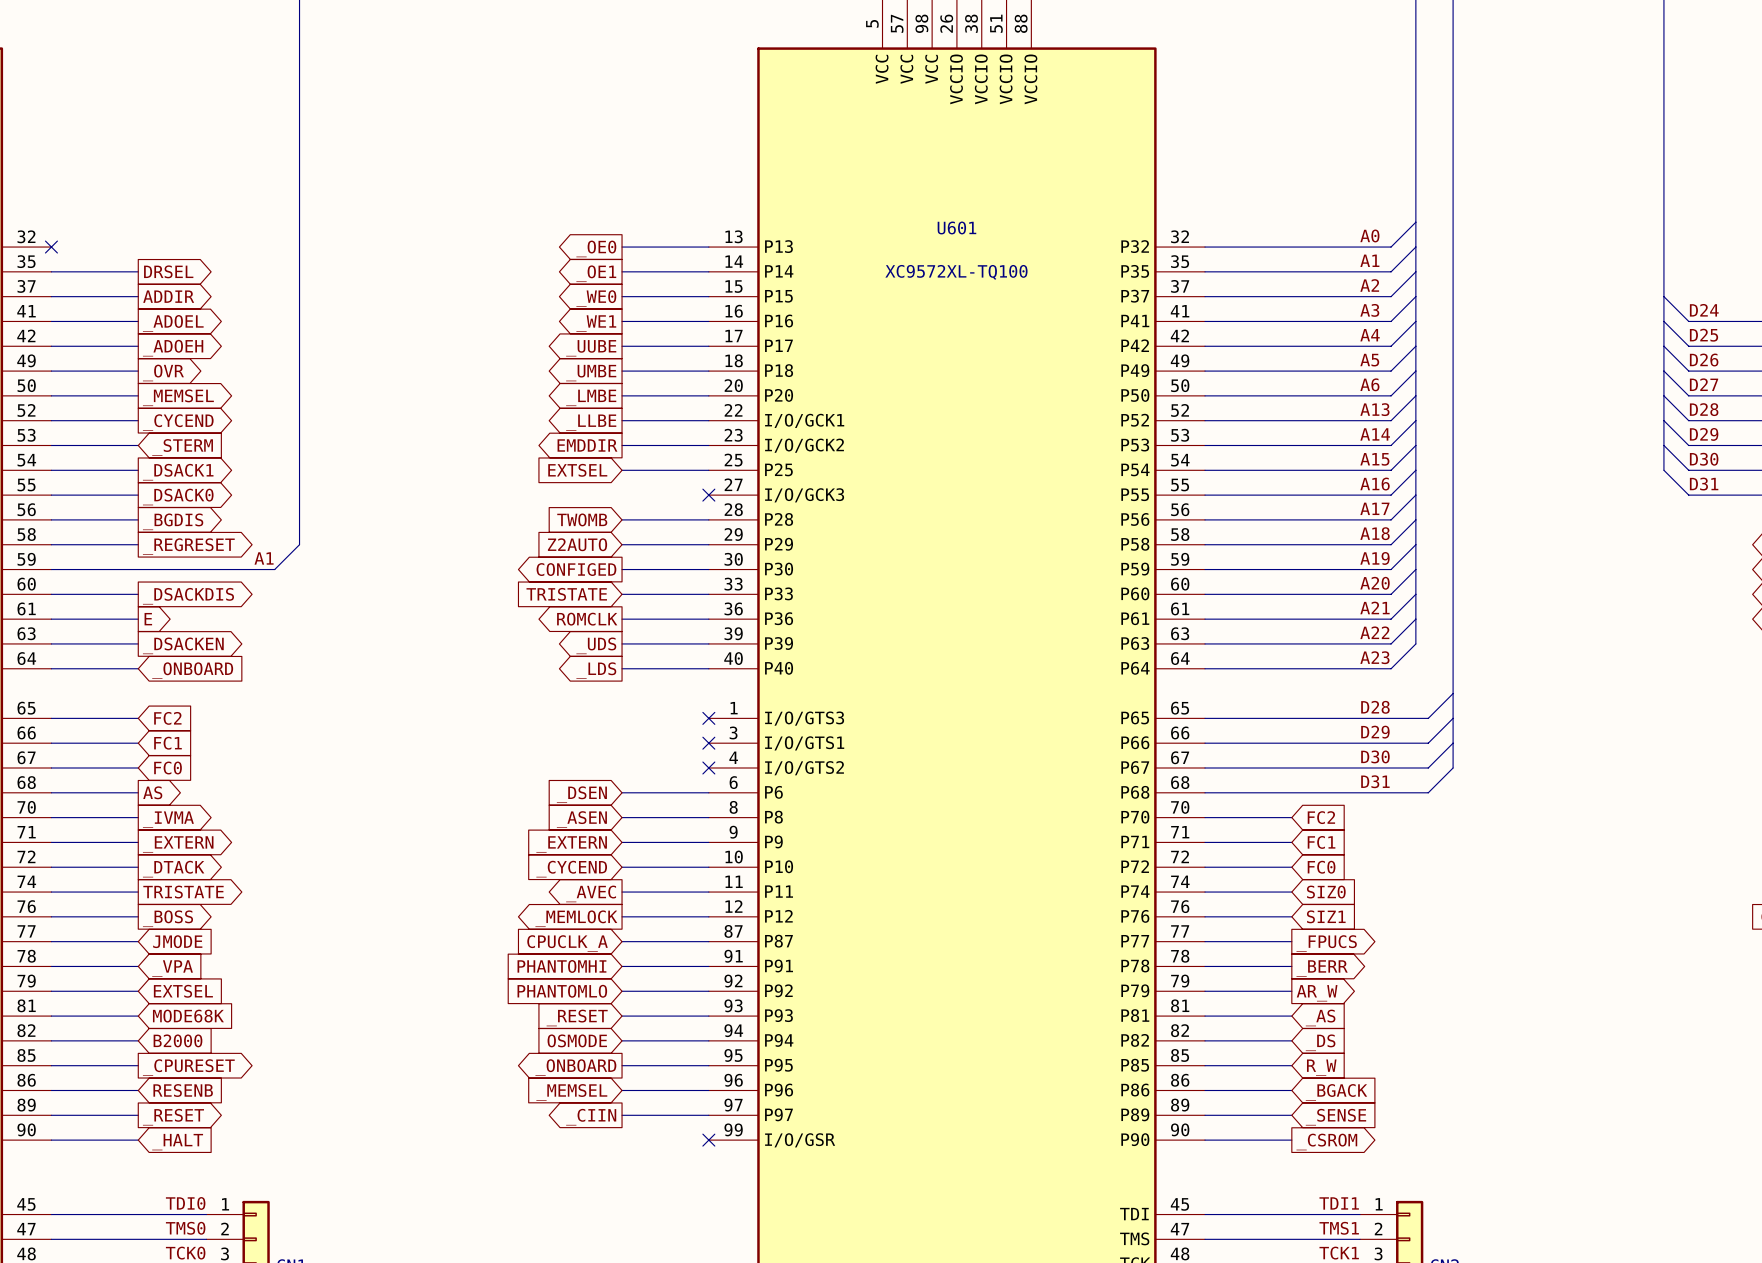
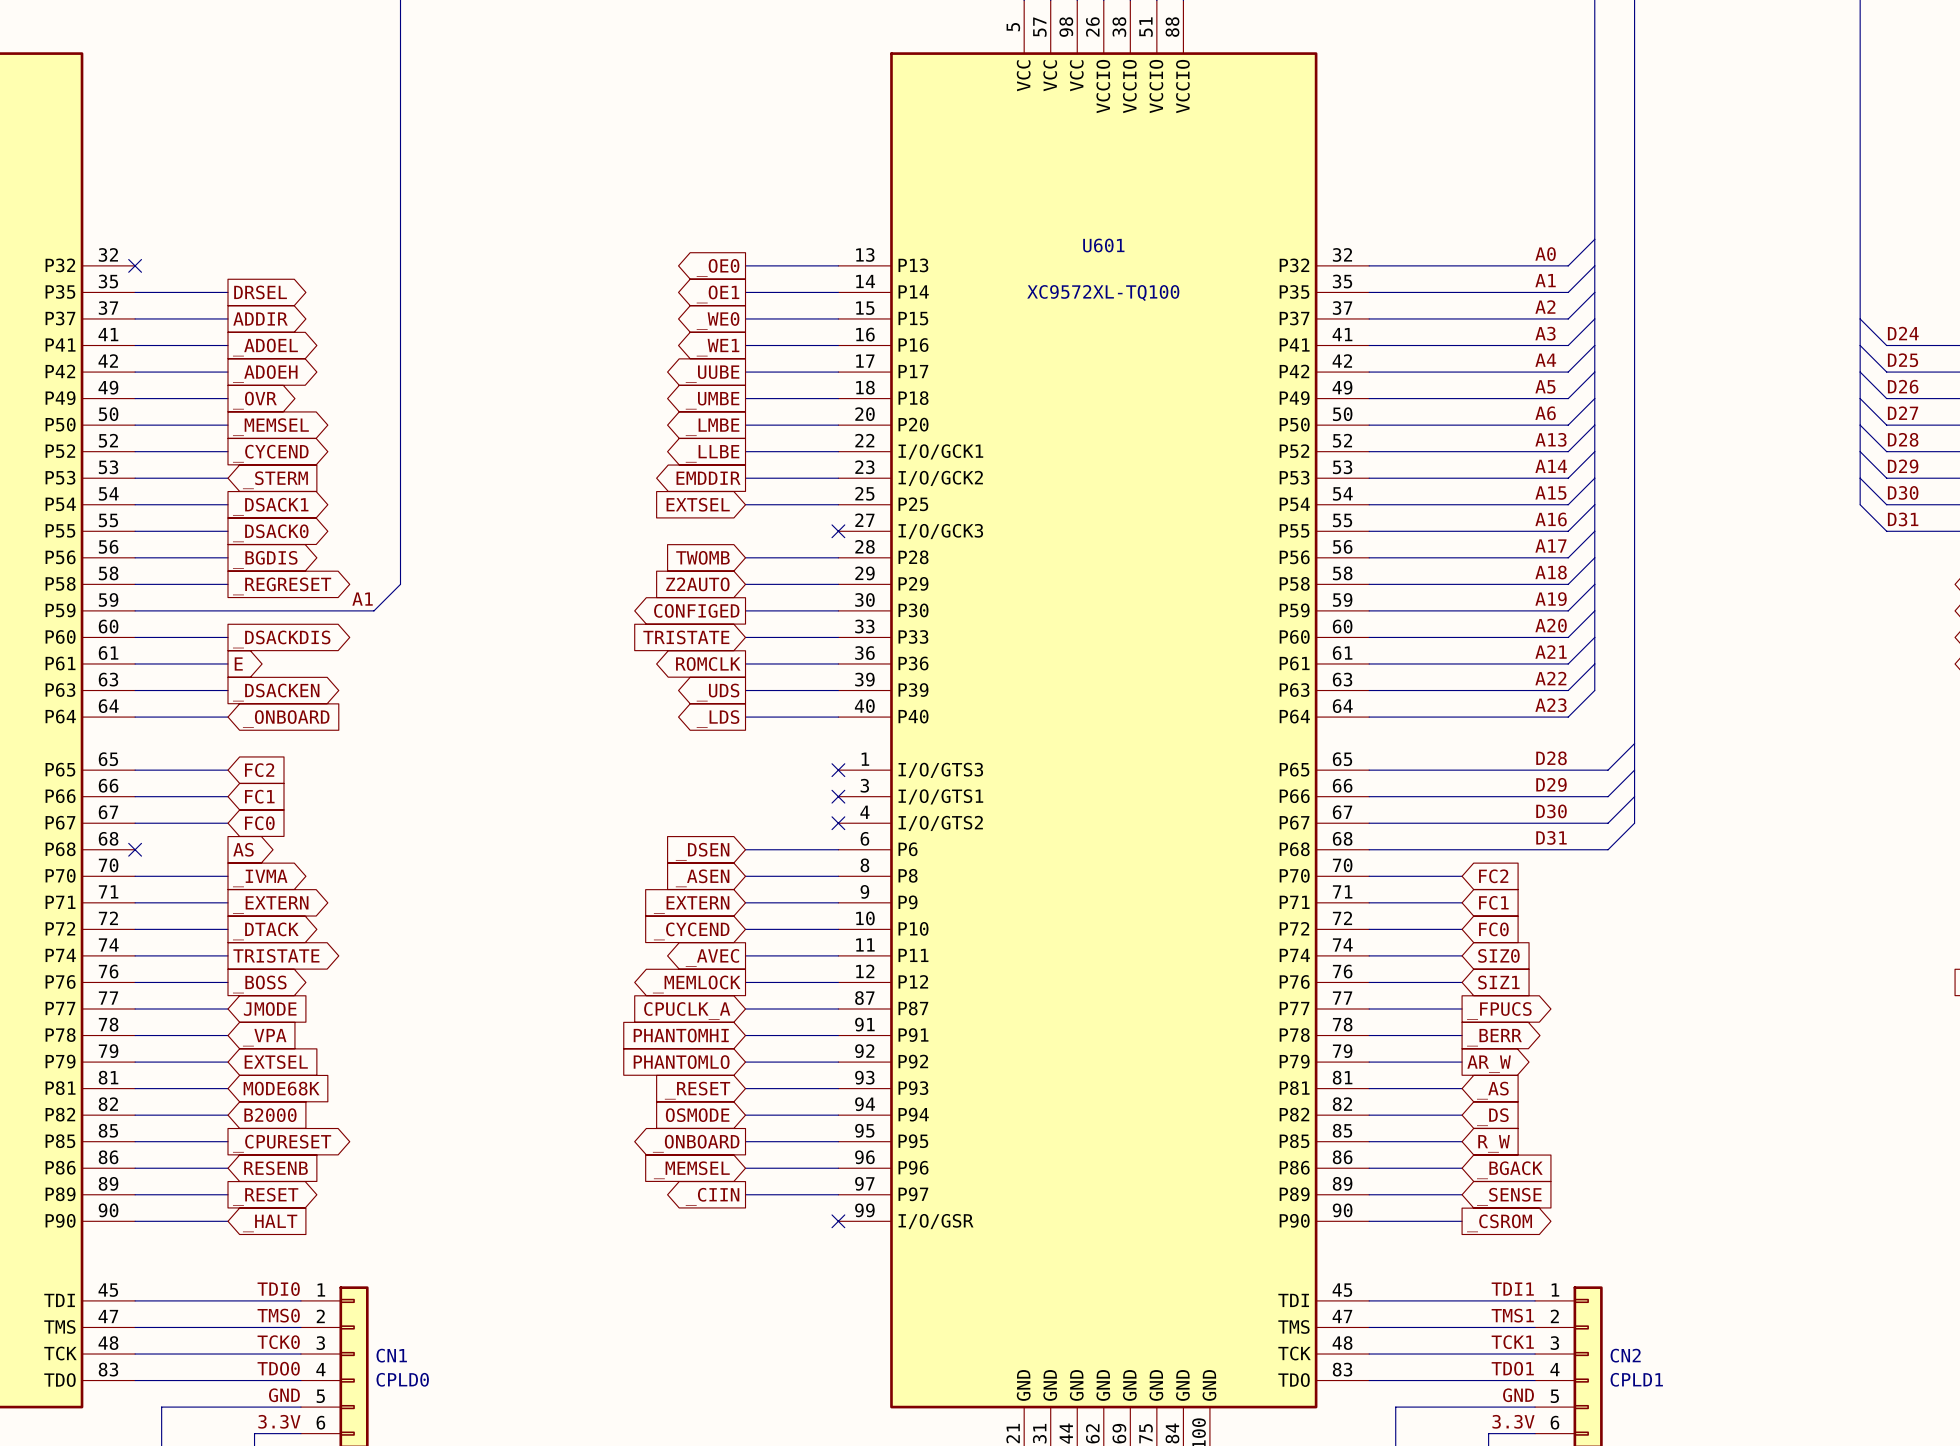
wire: (51, 792) (138, 792) -> none
no-connect mark: none -> (135, 849)

